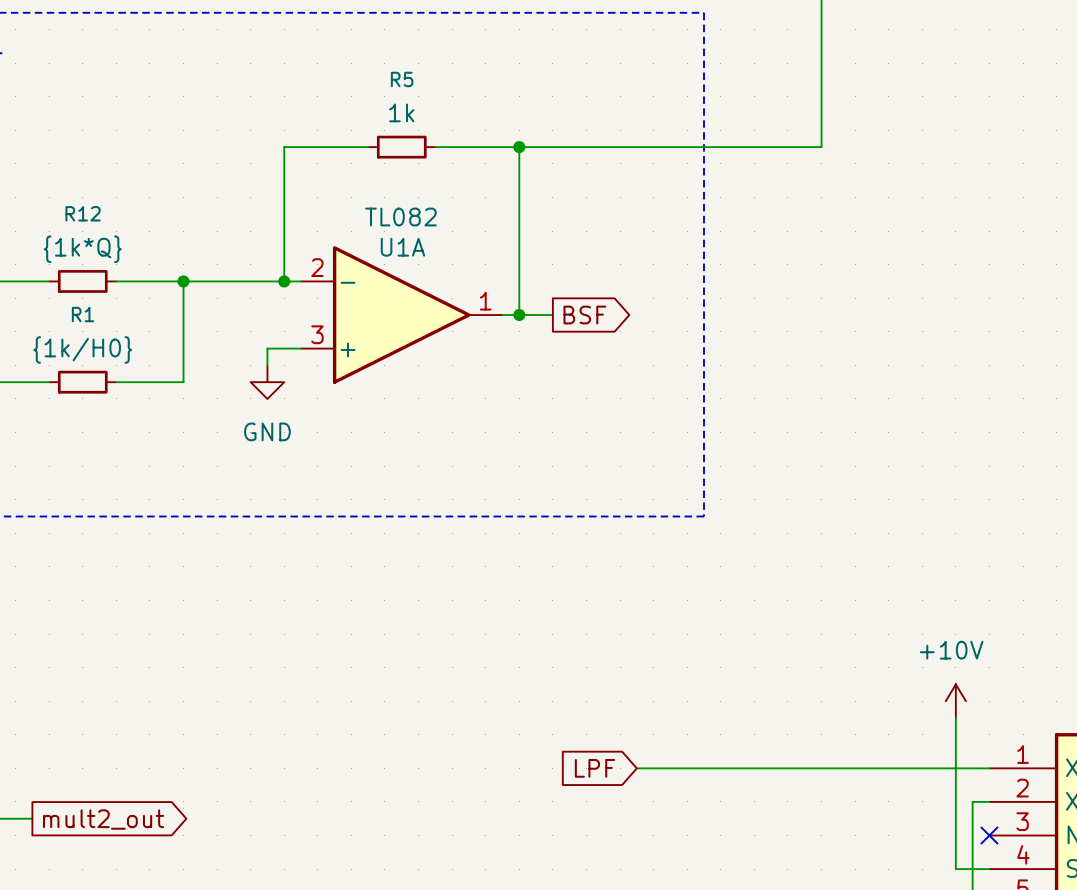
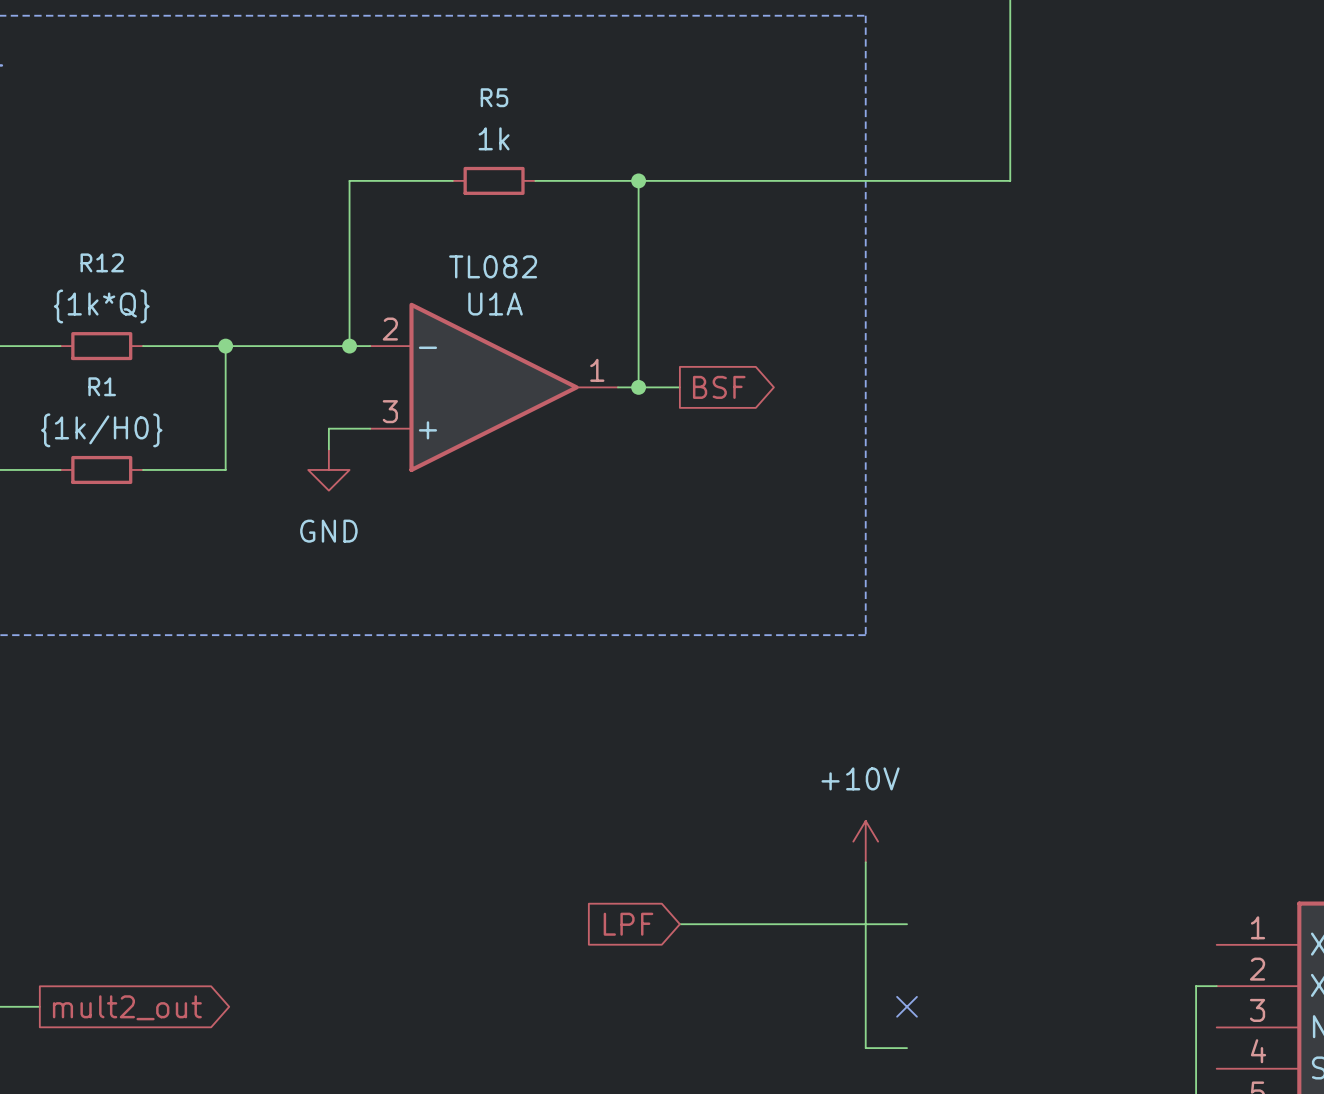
power symbol position: +10V (955, 701) -> +10V (865, 841)
wire: (955, 717) (955, 869) (989, 869) -> (865, 862) (865, 1048) (907, 1048)
wire: none -> (679, 924) (907, 924)
global label position: LPF (595, 768) -> LPF (628, 924)
wire: (636, 768) (989, 768) -> none
no-connect mark: none -> (907, 1006)
no-connect mark: (989, 835) -> none

